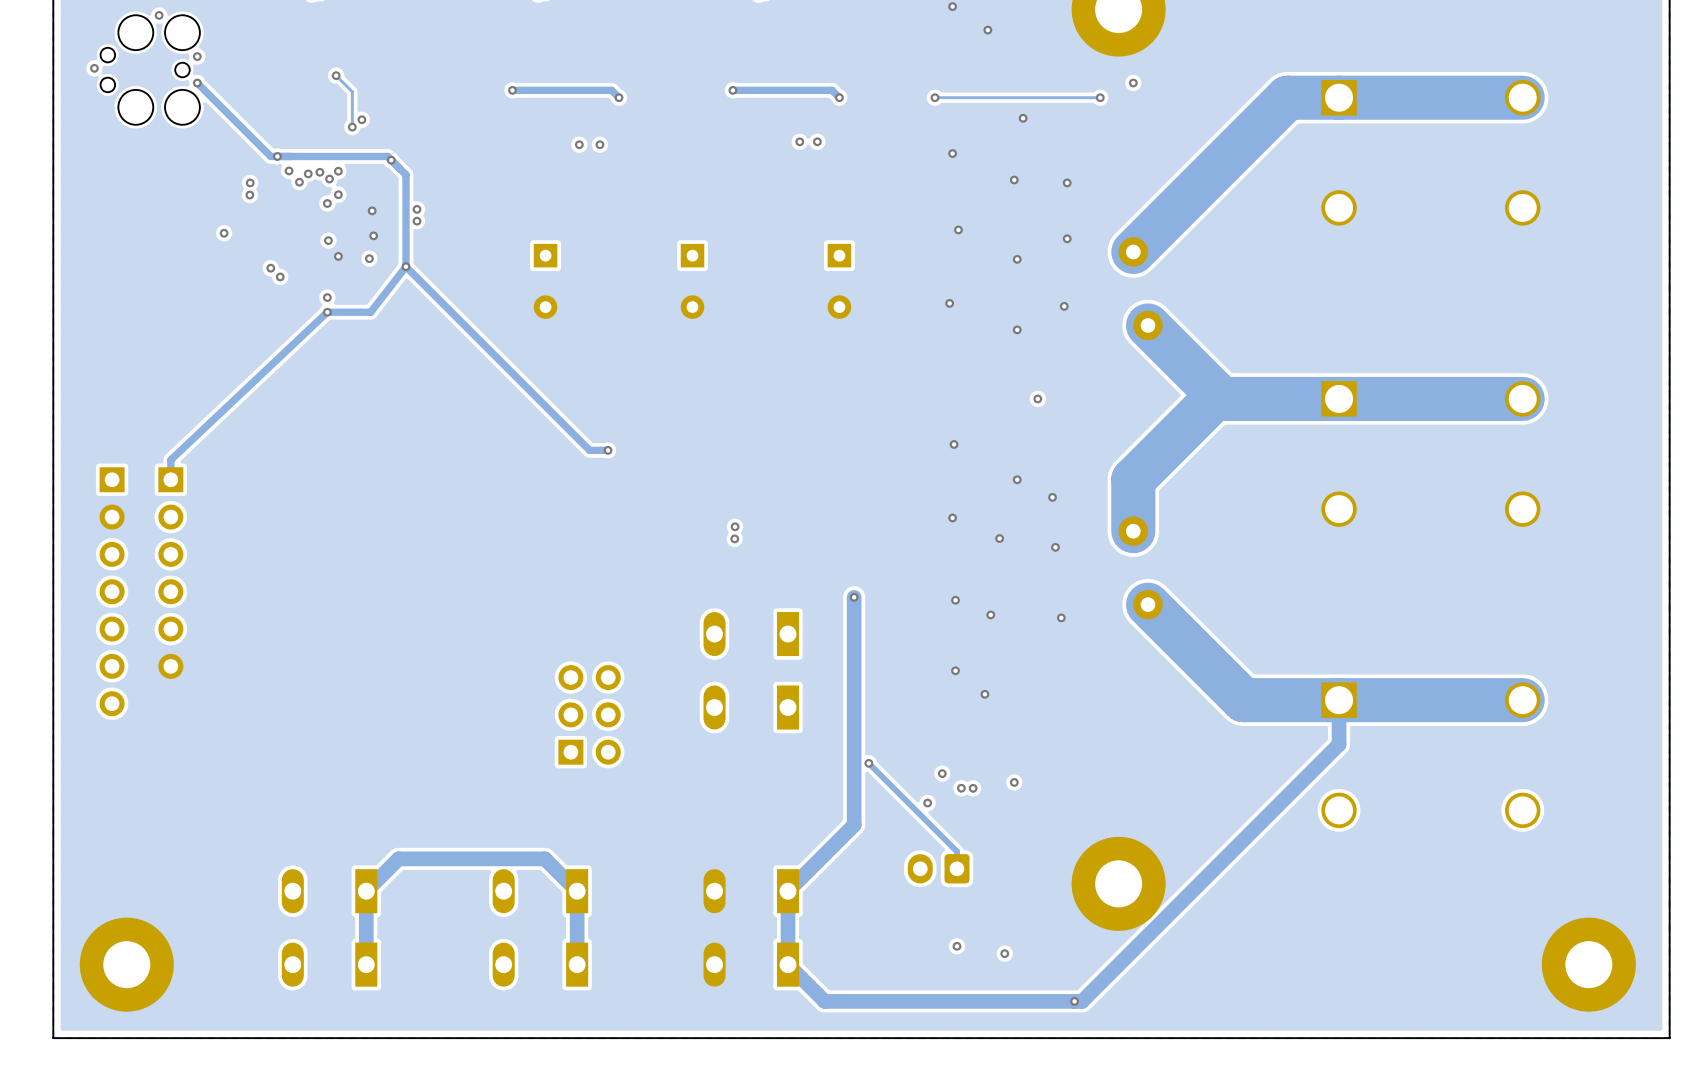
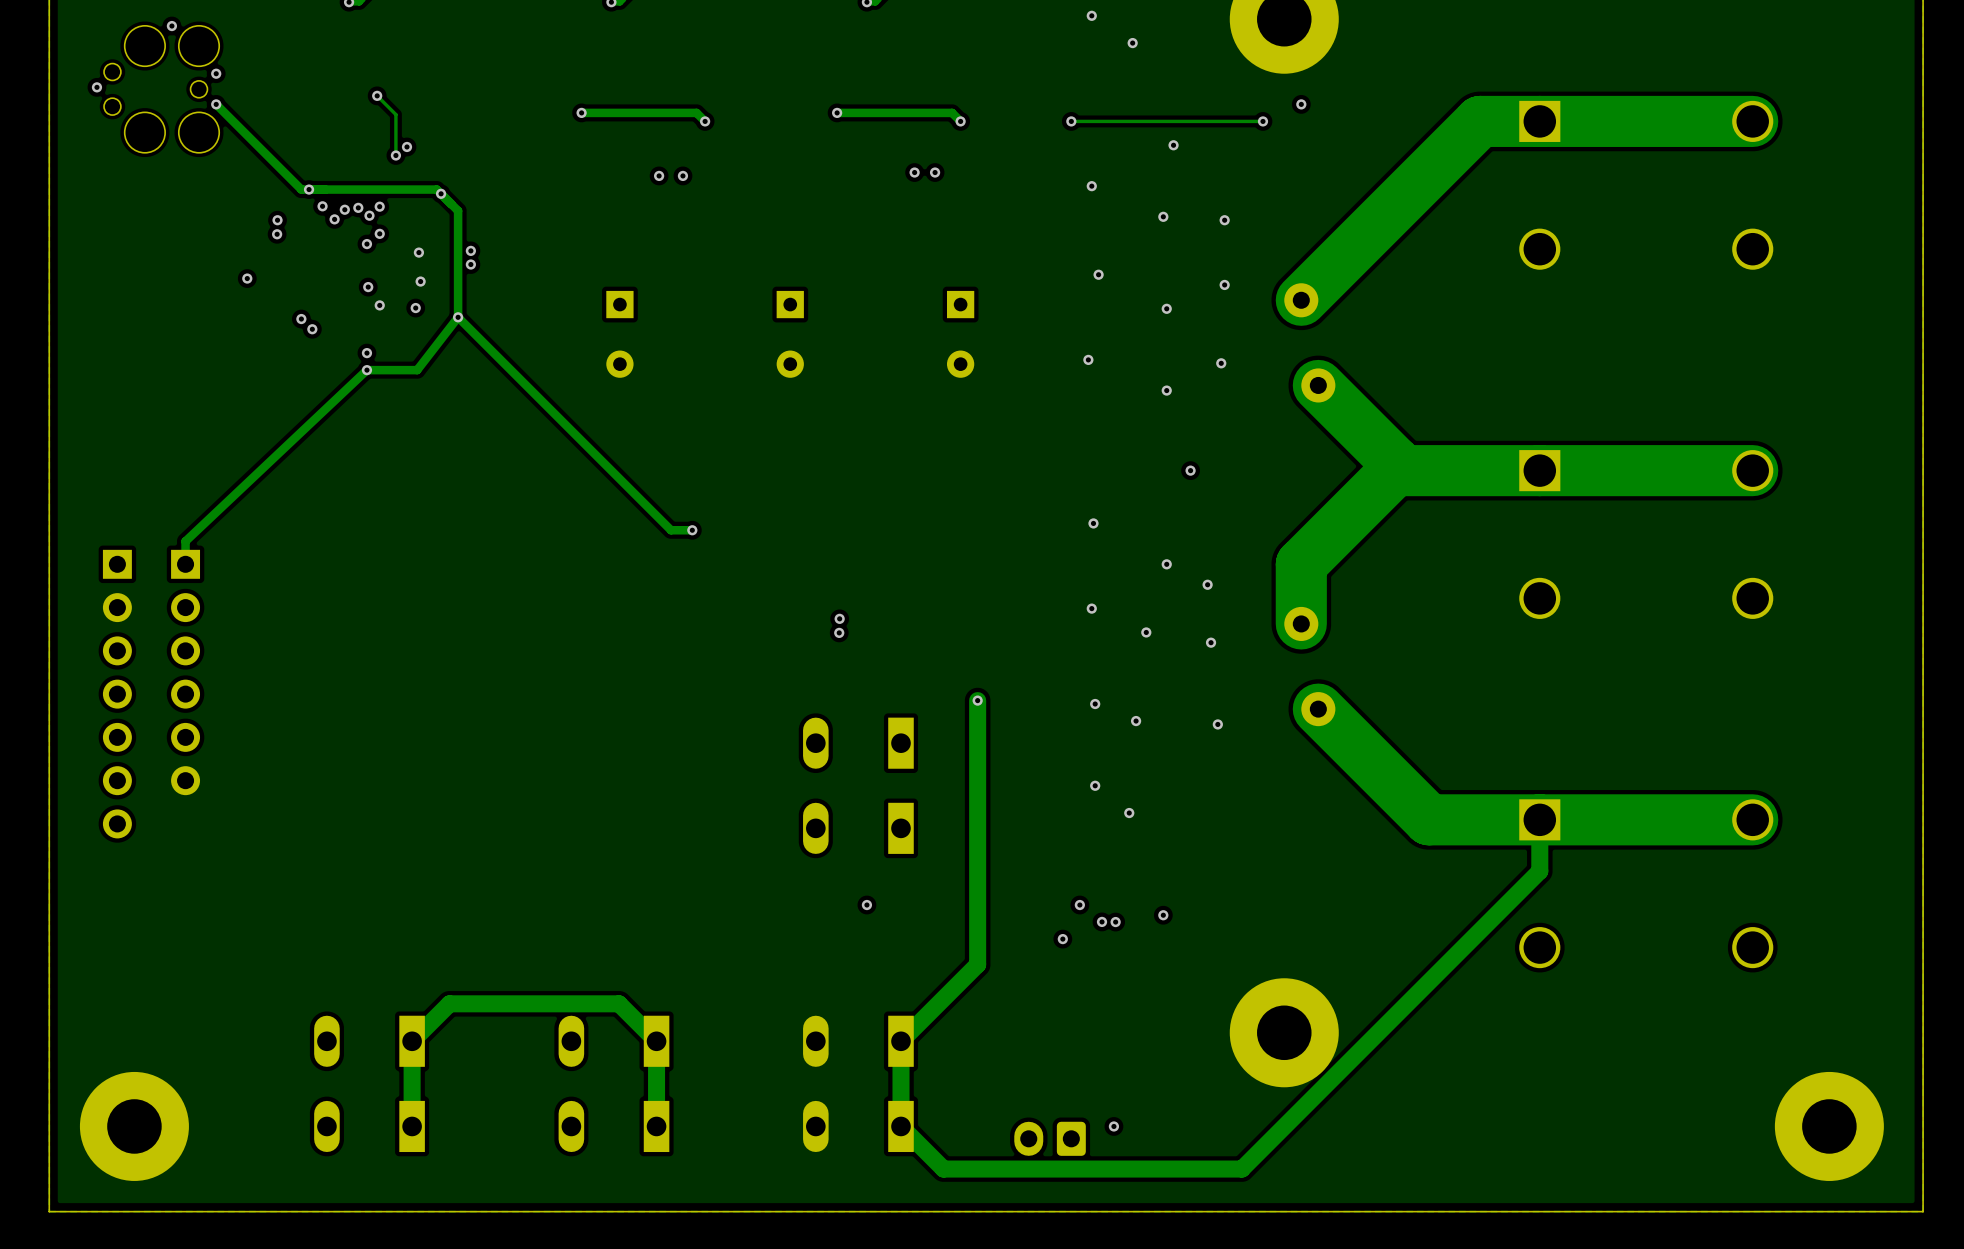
part: (589, 714) -> none
track: (868, 763) (957, 851) (957, 868) -> none
via: (868, 763) -> none
via: none -> (866, 905)
part position: (938, 868) -> (1050, 1138)
via: (957, 946) -> none
via: (1004, 953) -> none
via: none -> (1113, 1126)
via: (1074, 1001) -> none

